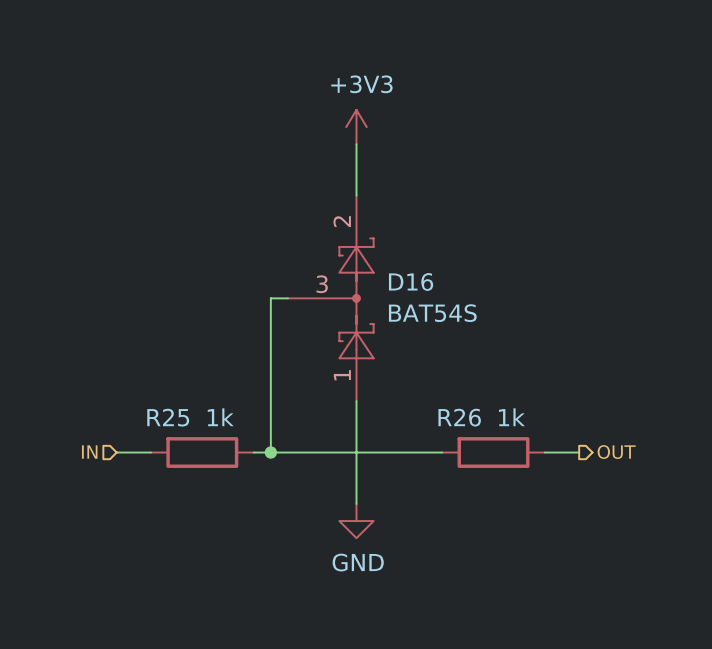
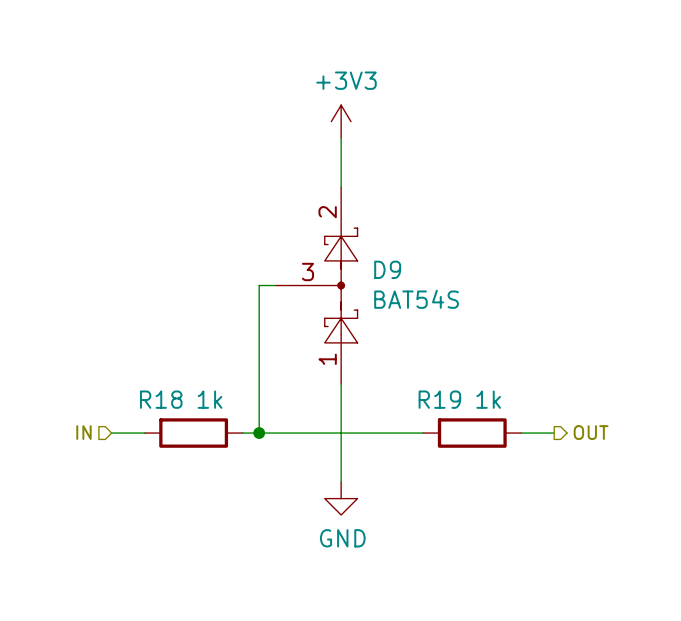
D16 name: D16 (411, 281) -> D9 (387, 269)
R25 name: R25 (168, 417) -> R18 (161, 399)
R26 name: R26 (459, 417) -> R19 (439, 399)

